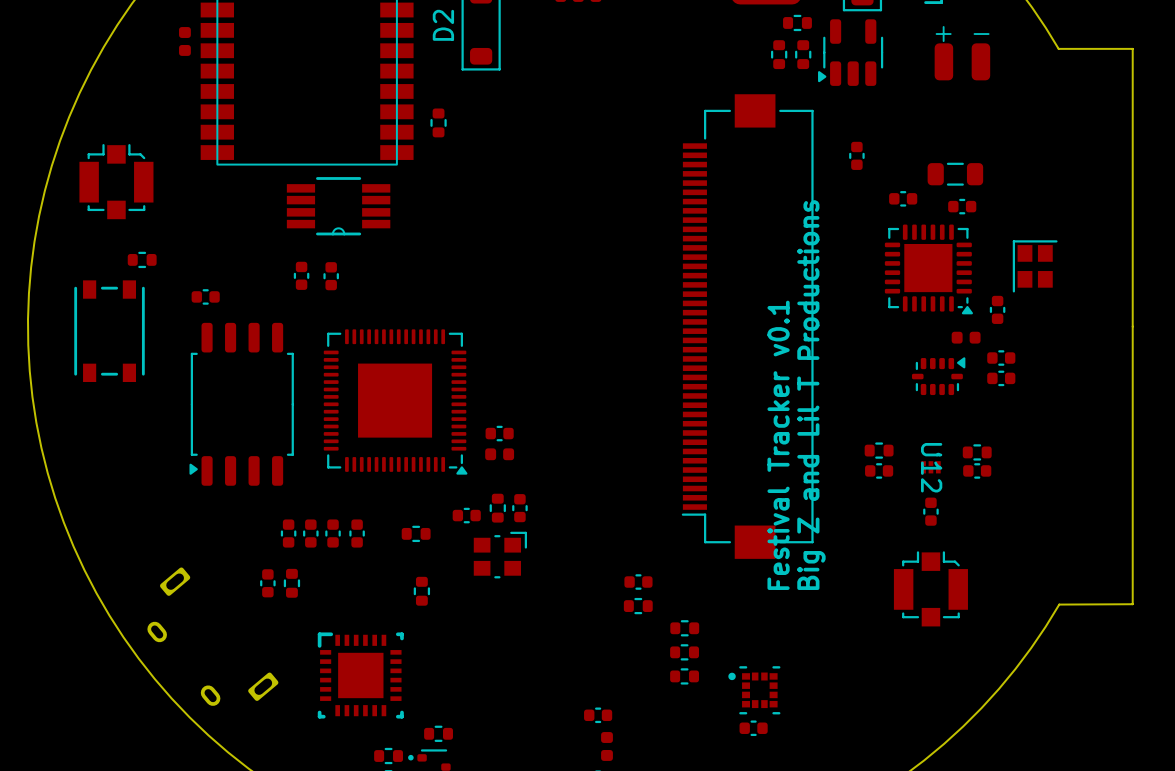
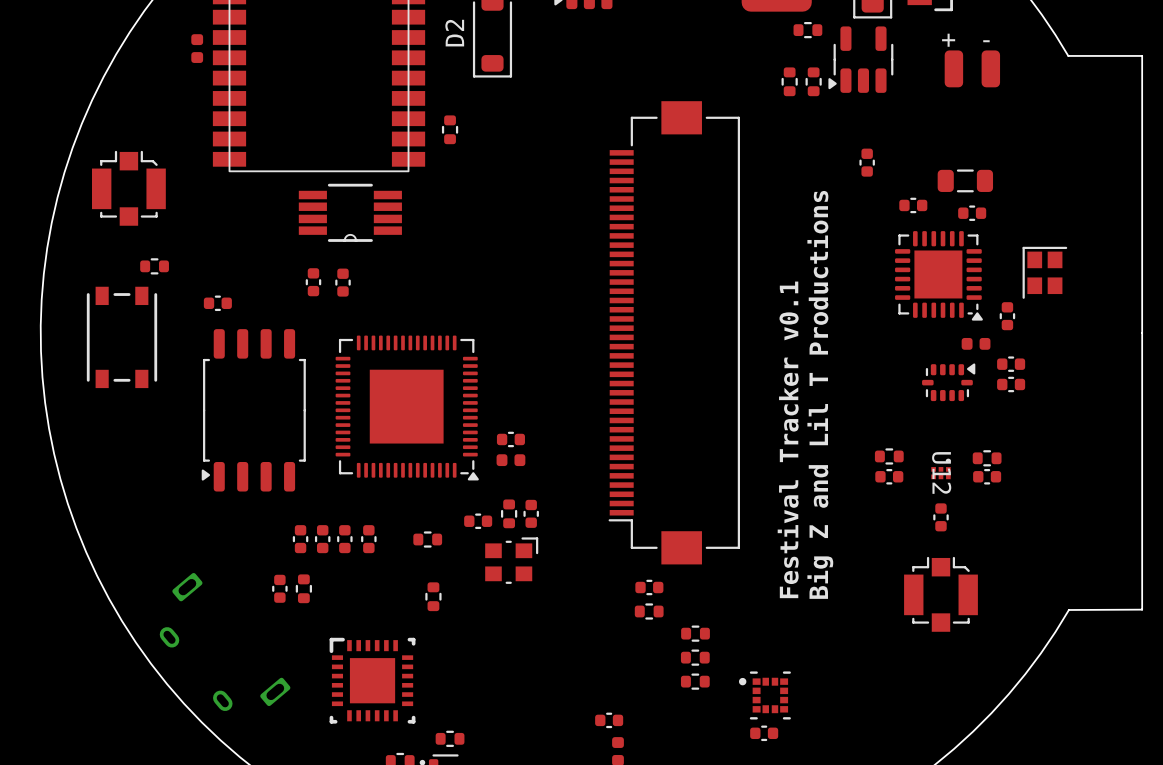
part: (779, 54) -> none
part: (803, 54) -> none
part: none -> (789, 81)
part: none -> (813, 81)
part position: (747, 326) -> (674, 332)

